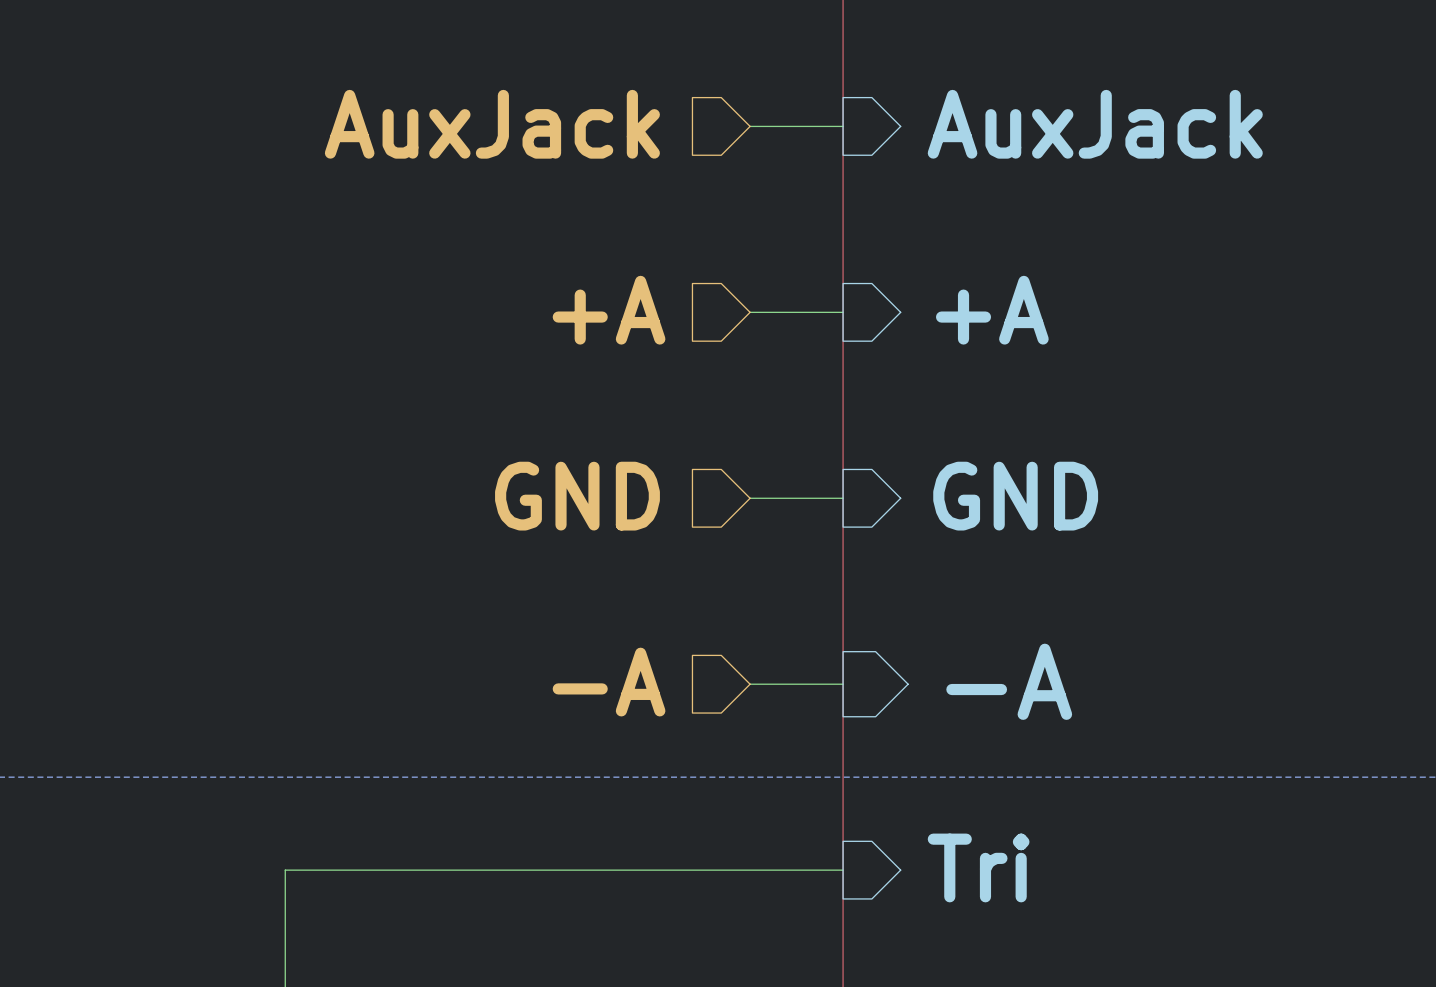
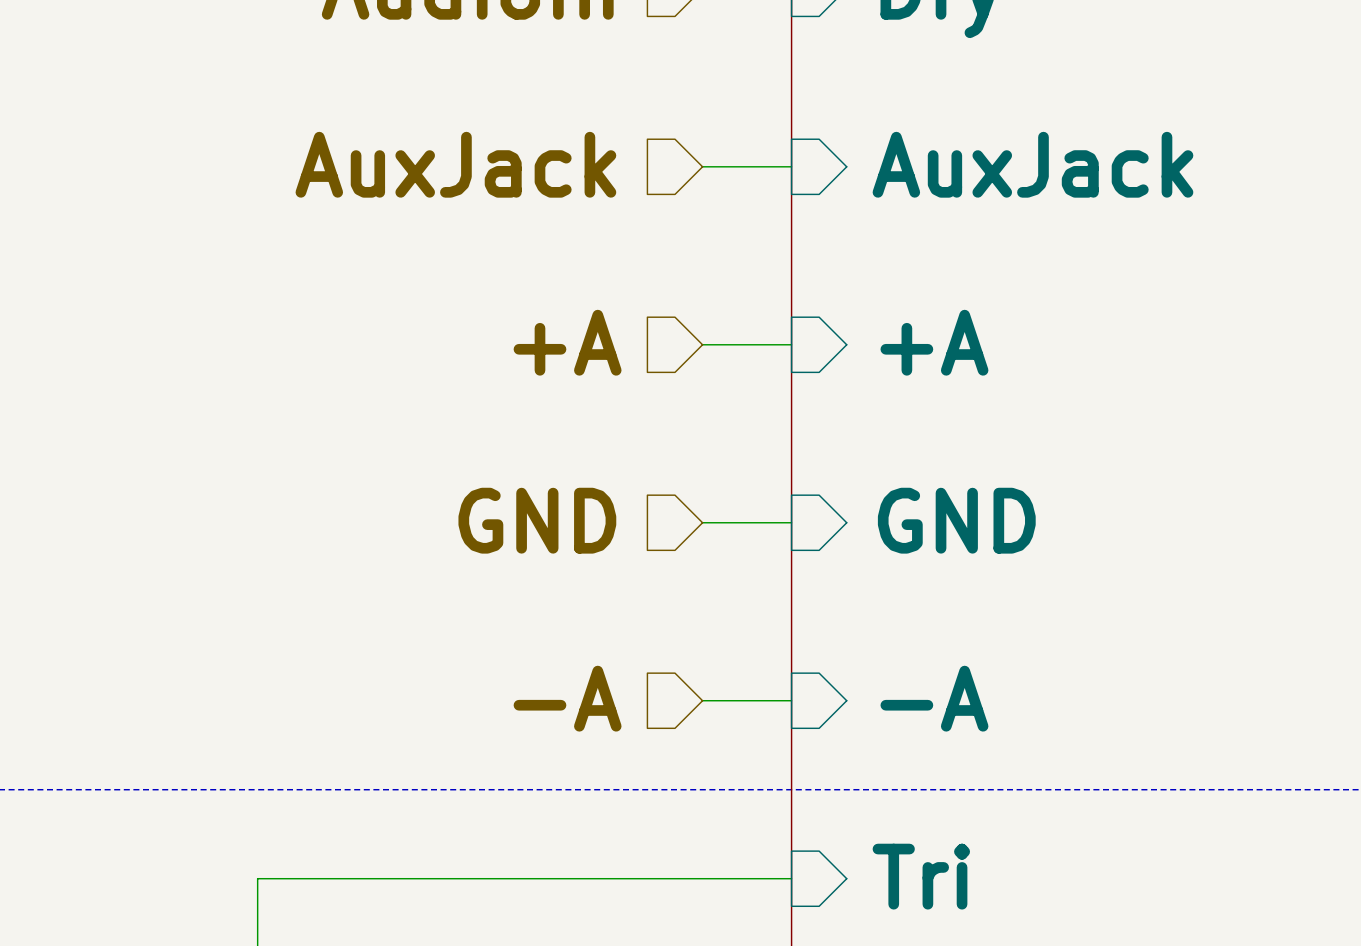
sheet pin position: -A (1009, 681) -> -A (934, 698)

